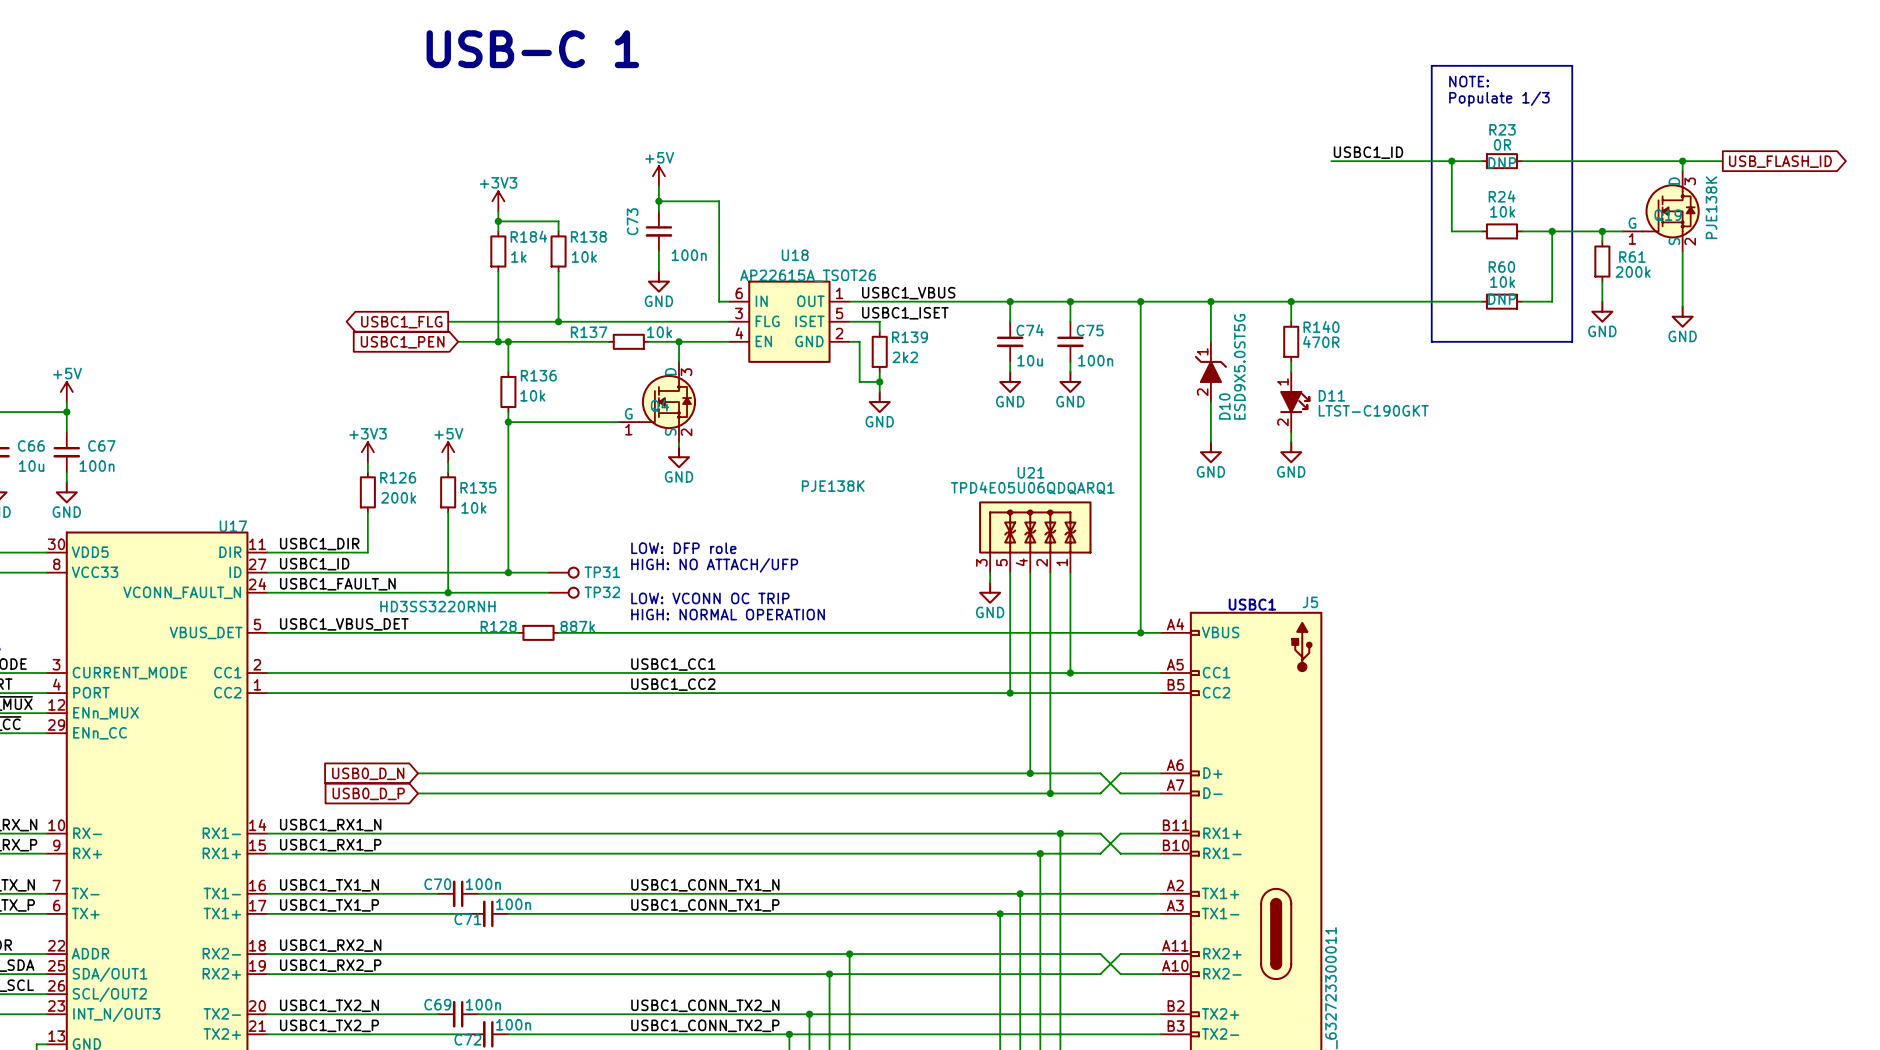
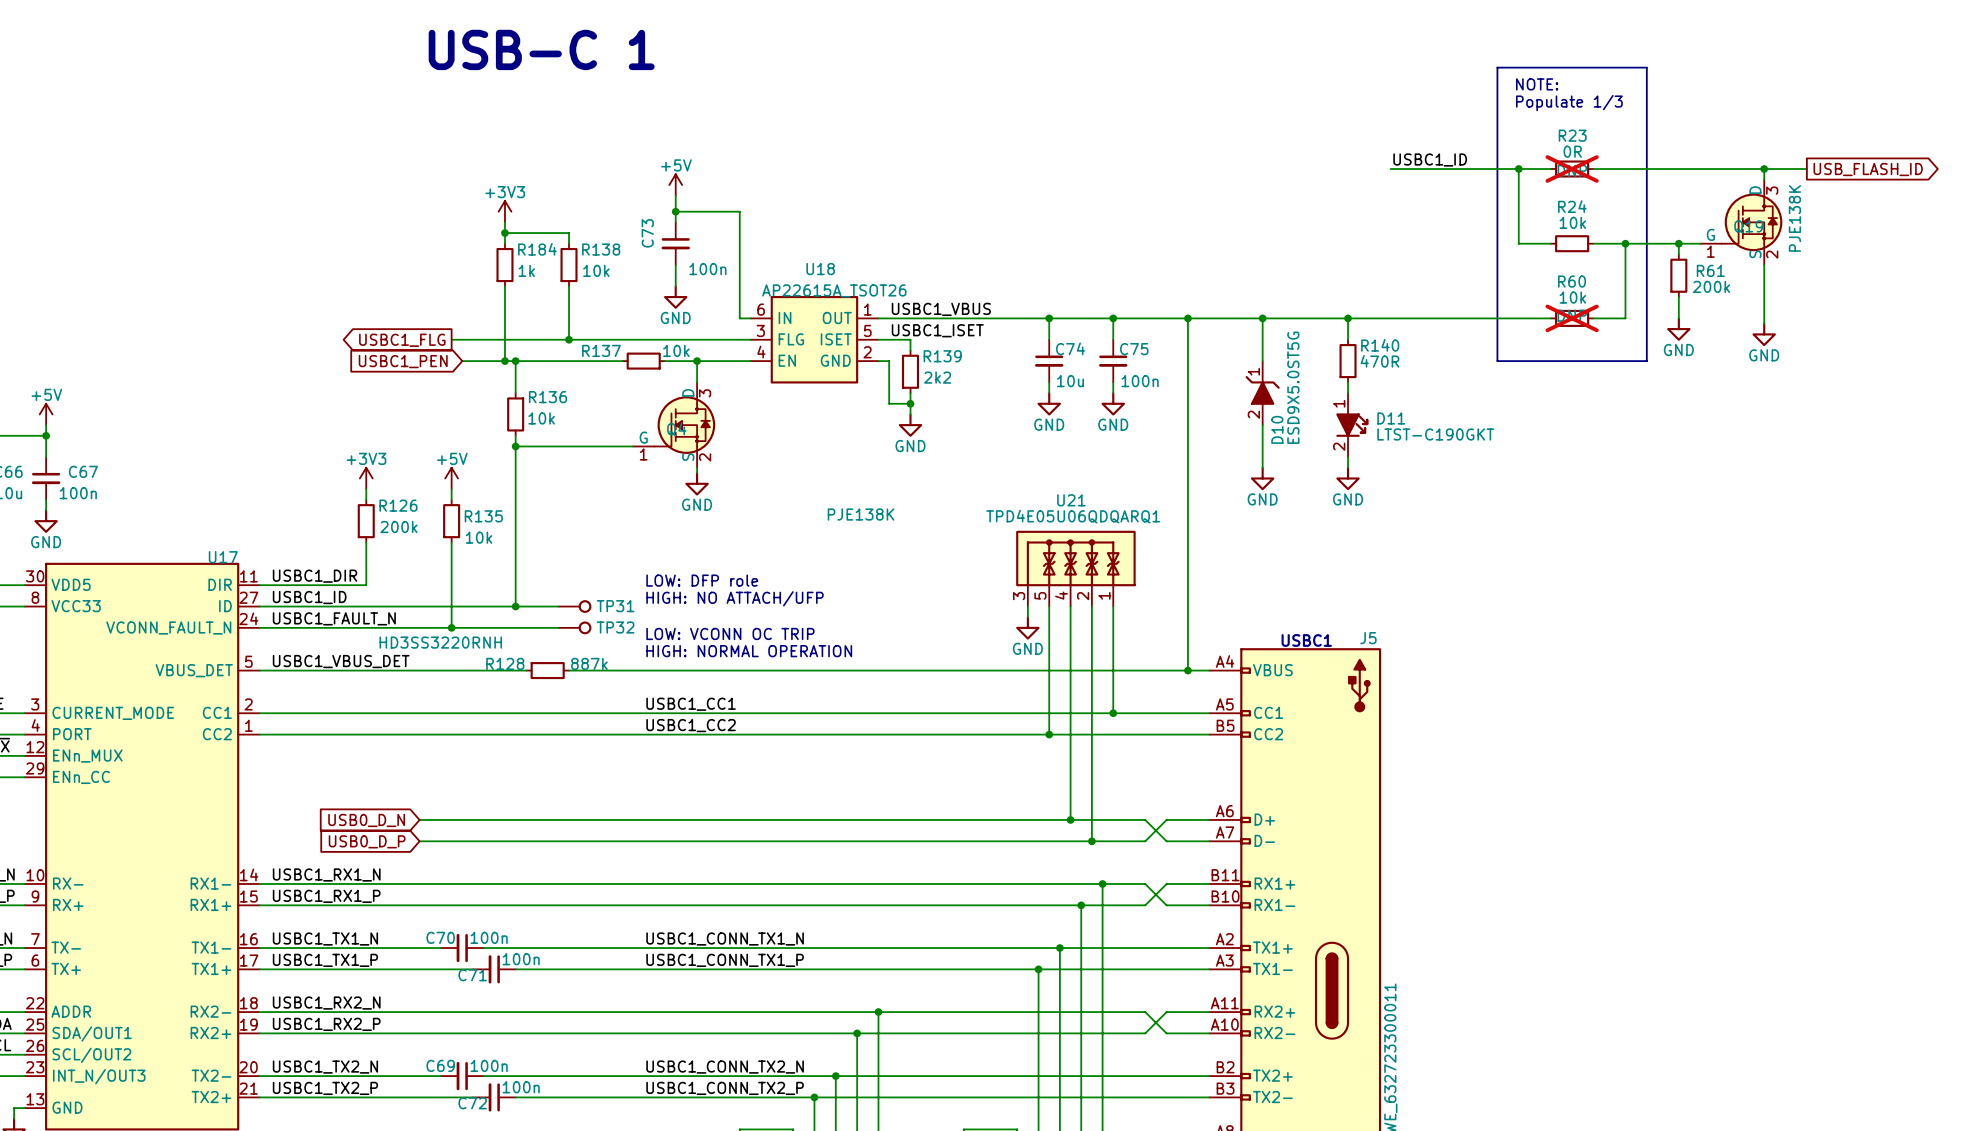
R23 do-not-place cross: none -> (1572, 169)
R60 do-not-place cross: none -> (1572, 318)

